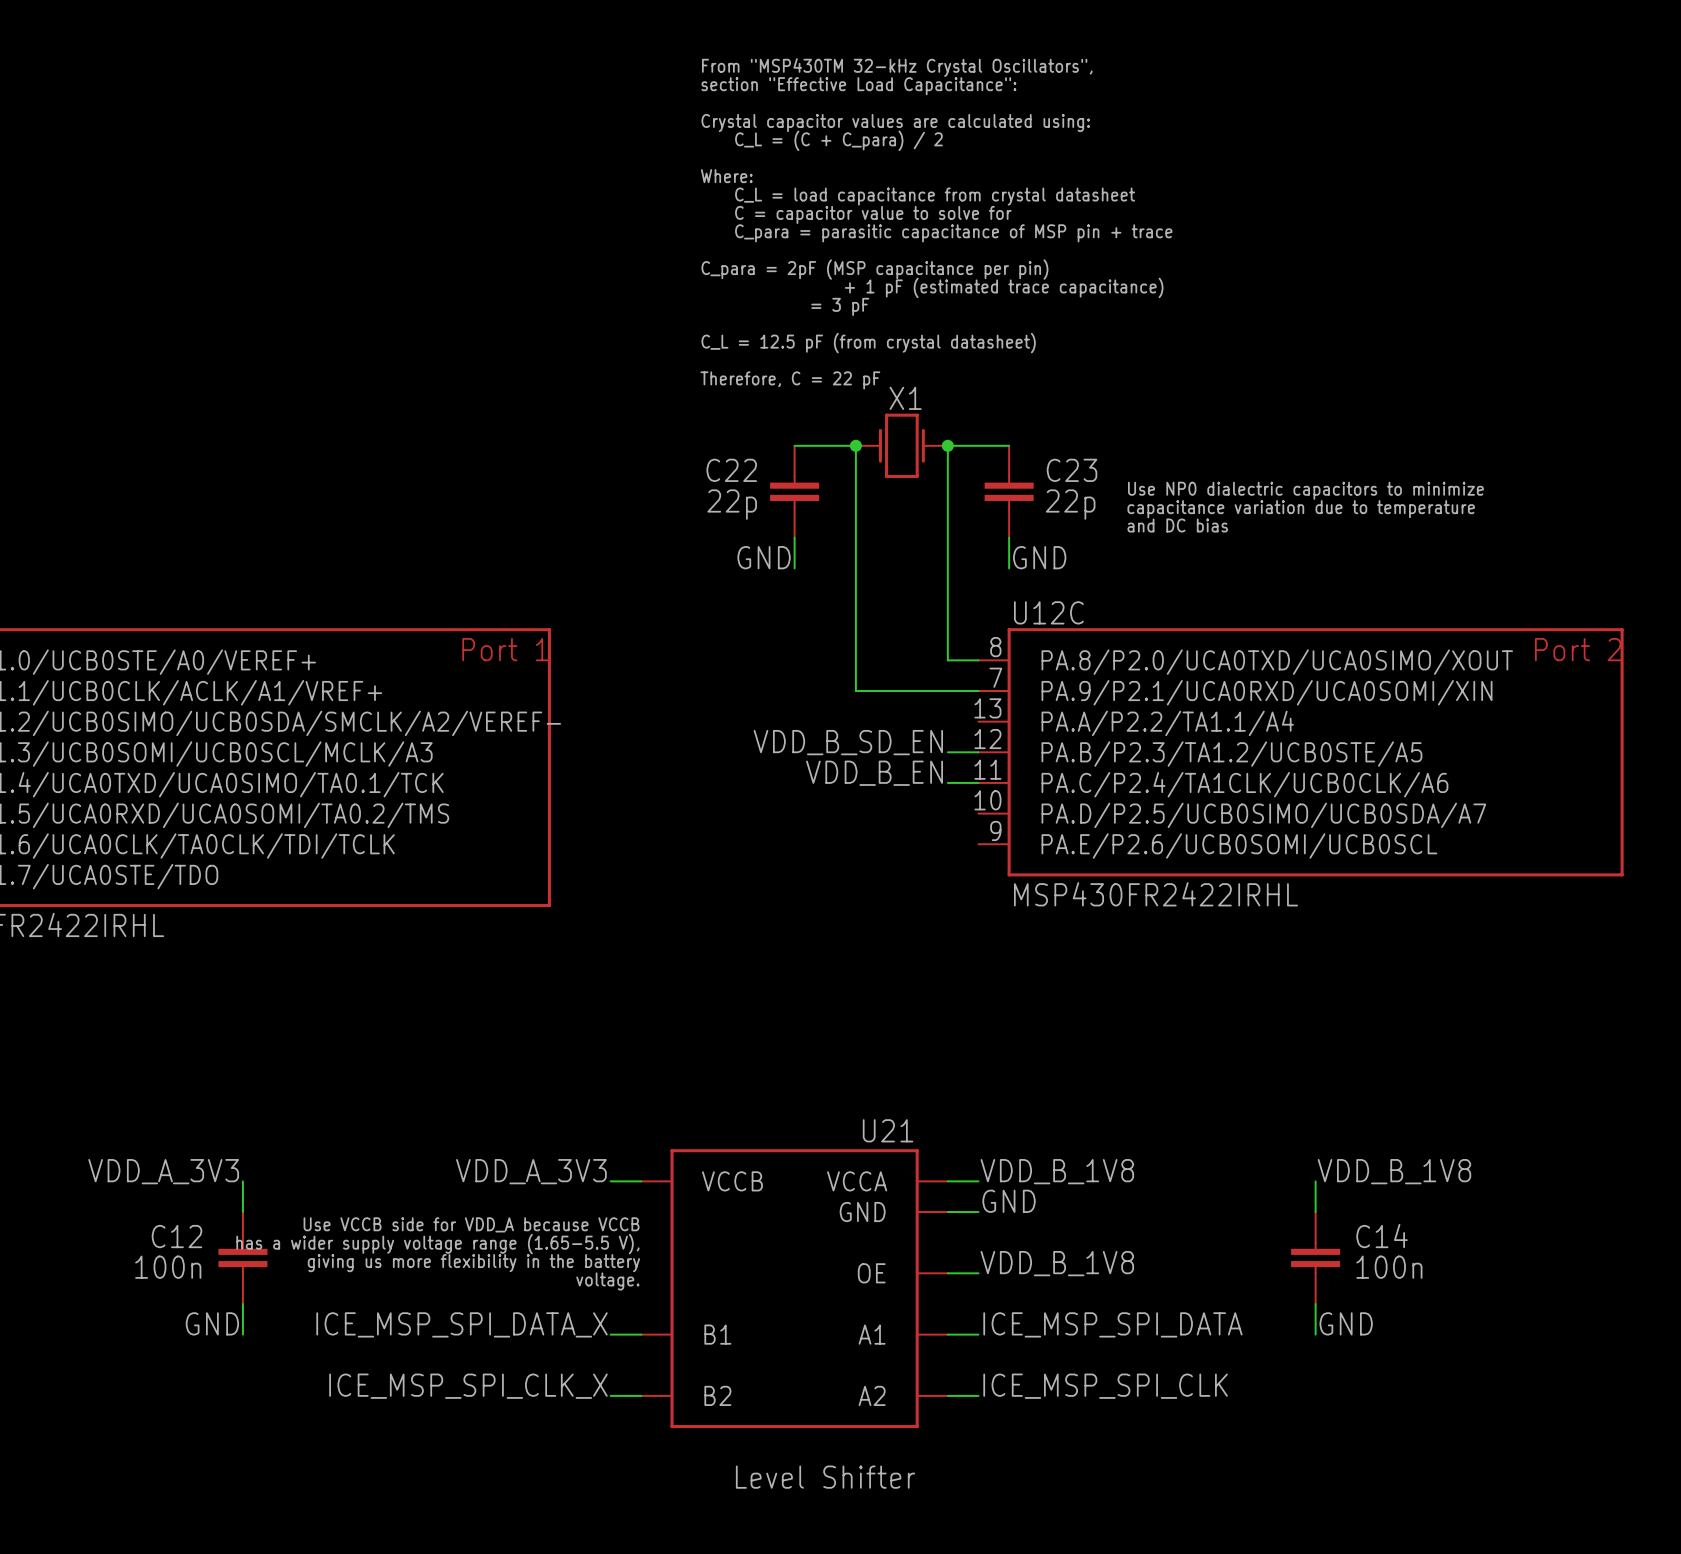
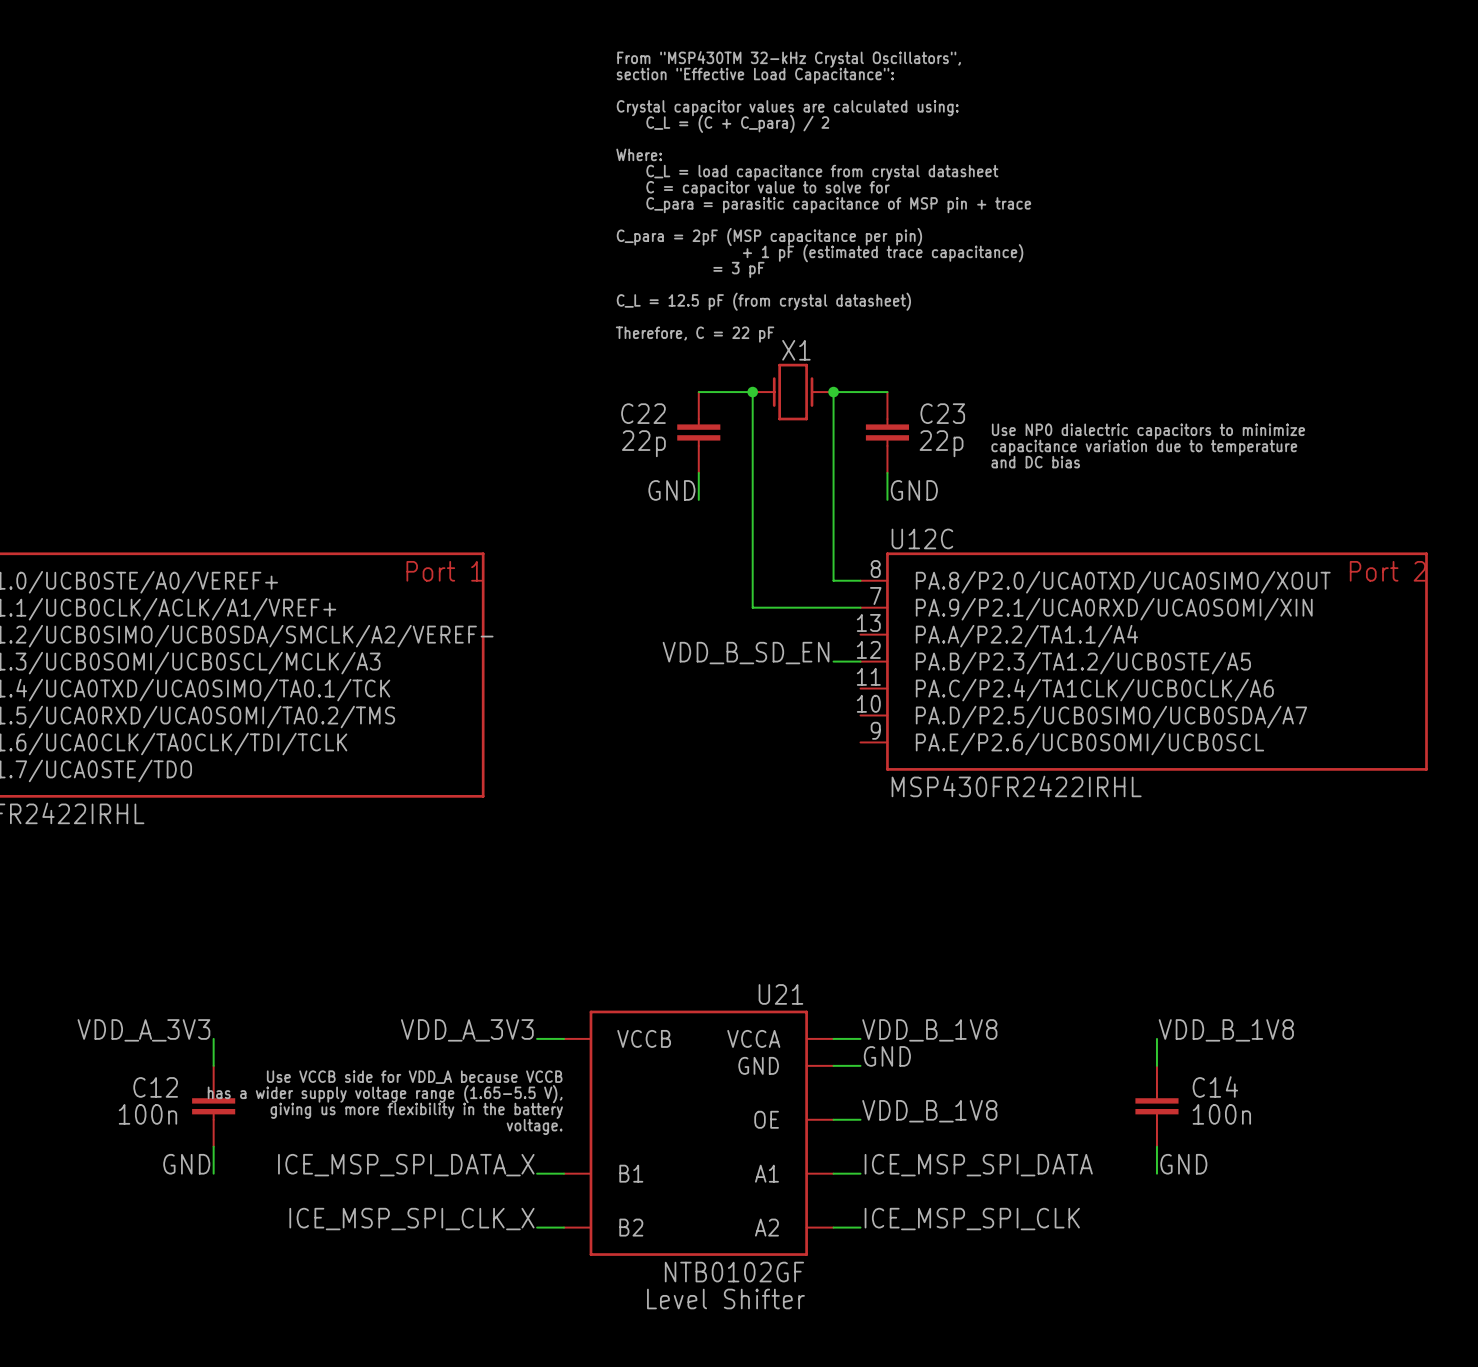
label: VDD_B_EN (874, 773) -> none
wire: (947, 782) (978, 782) -> none
U21 text: none -> NTB0102GF (734, 1272)

